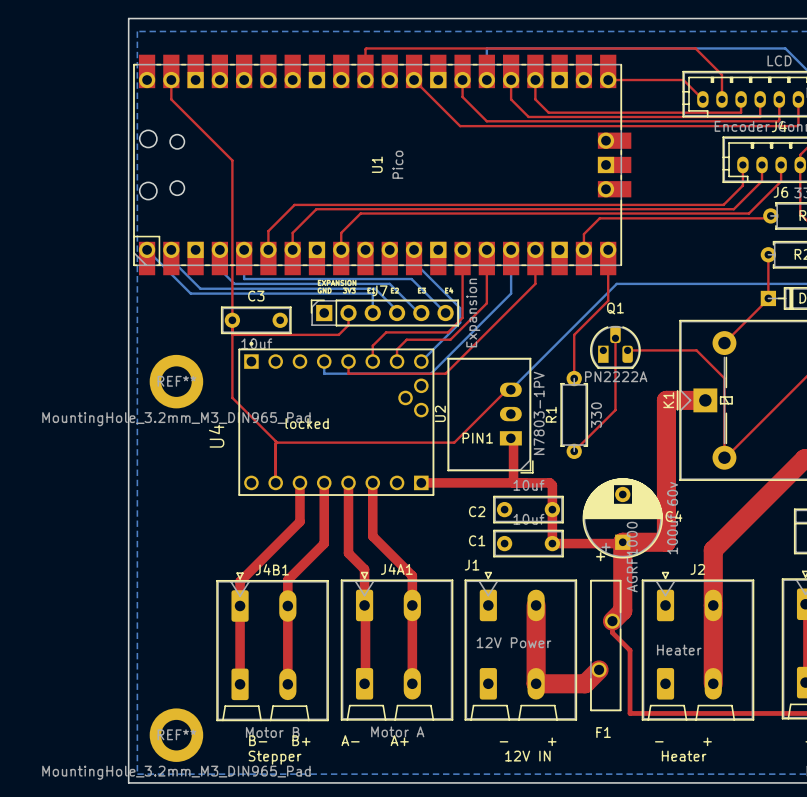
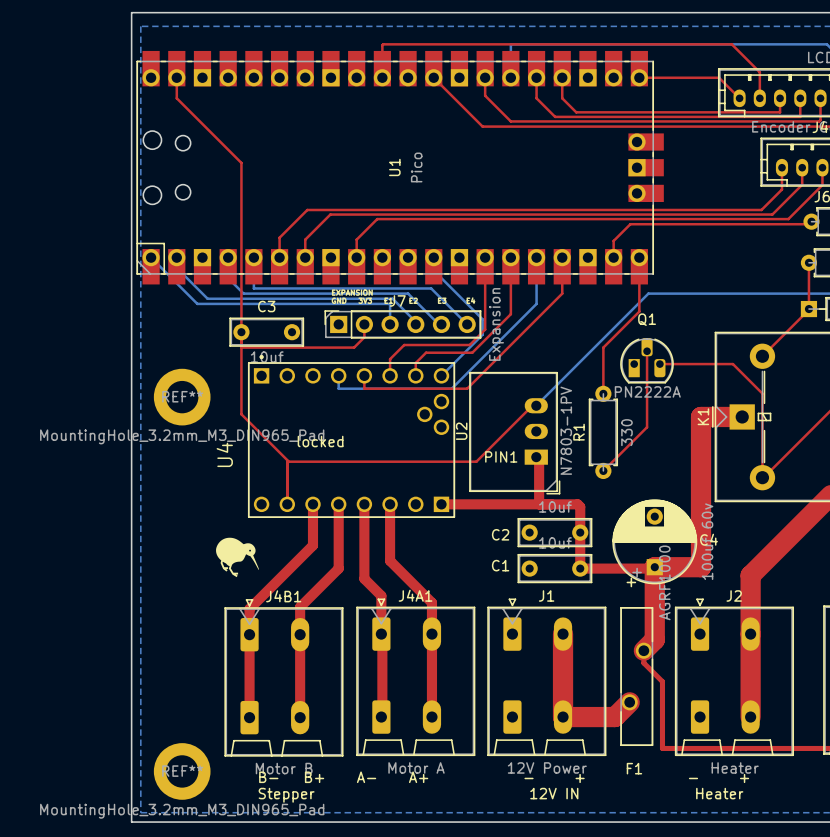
drawing: none -> [216, 537, 260, 578]
J1 name position: J1 (472, 565) -> J1 (546, 595)
J1 value position: 12V Power (514, 642) -> 12V Power (547, 767)
J2 value position: Heater (679, 650) -> Heater (735, 767)

